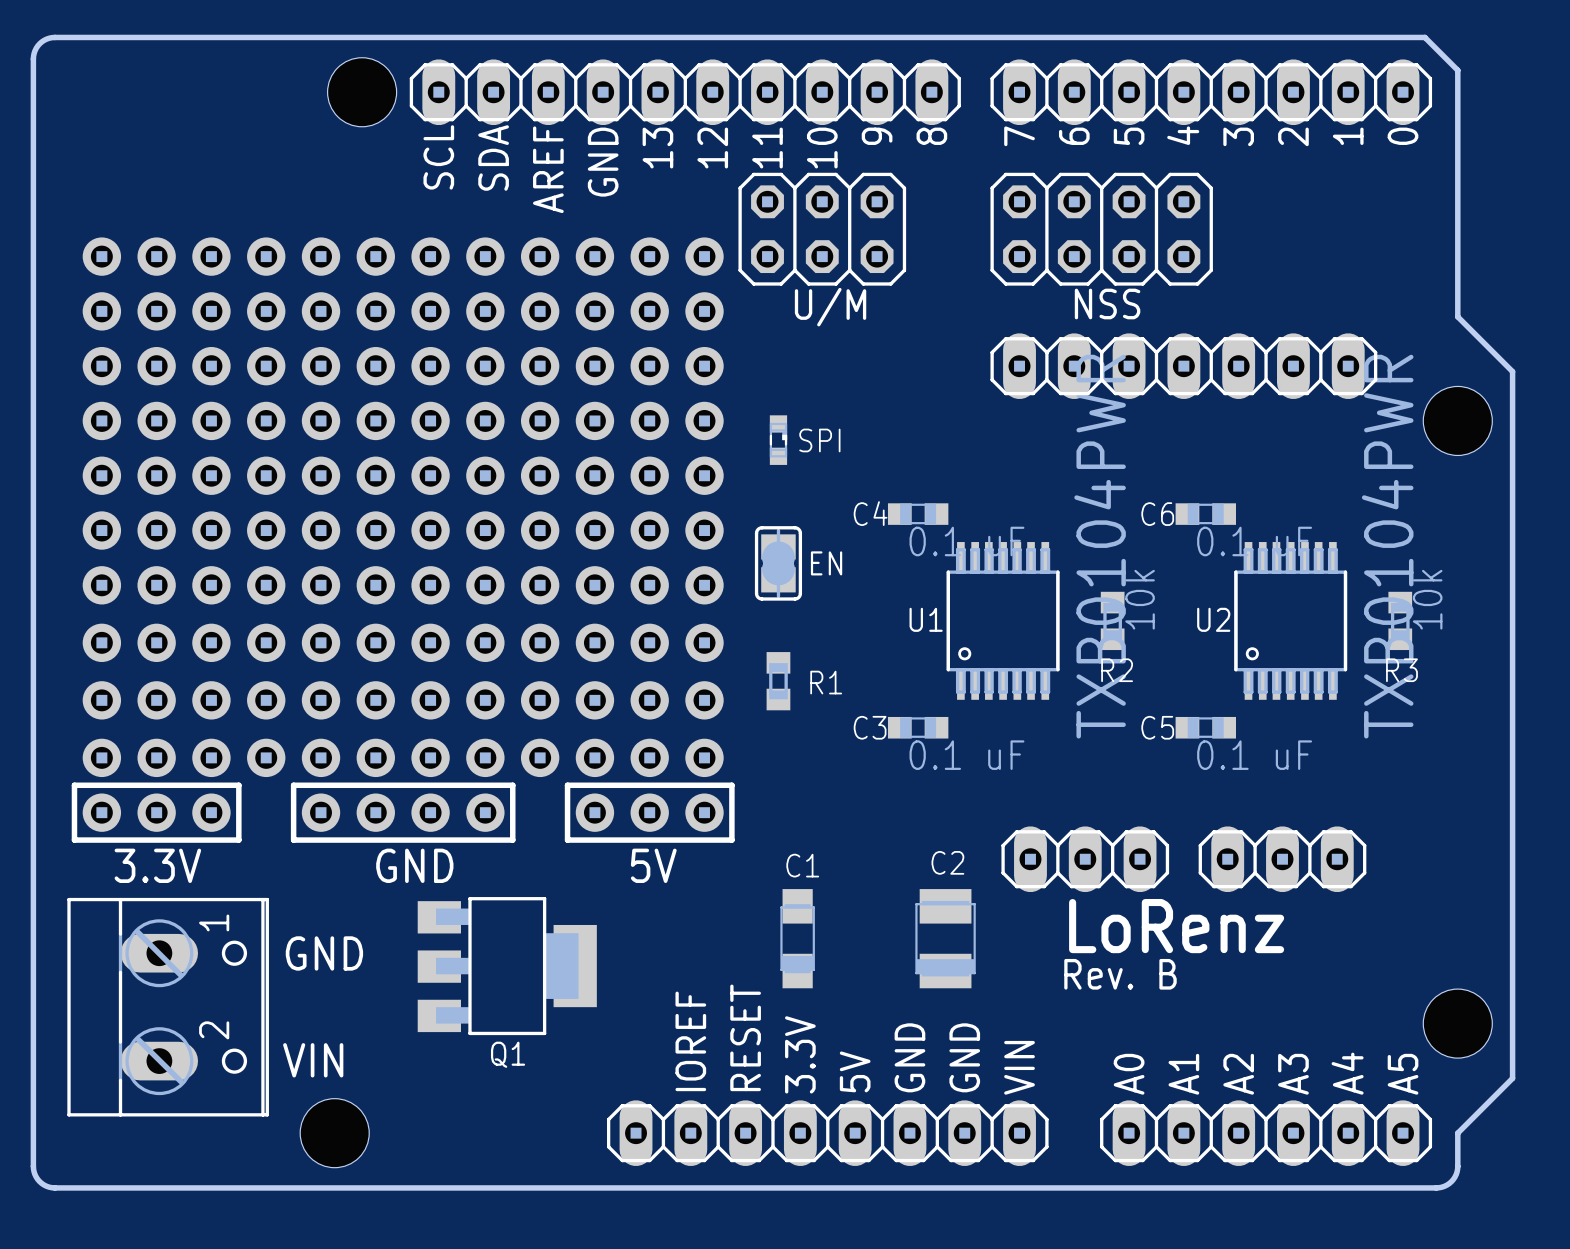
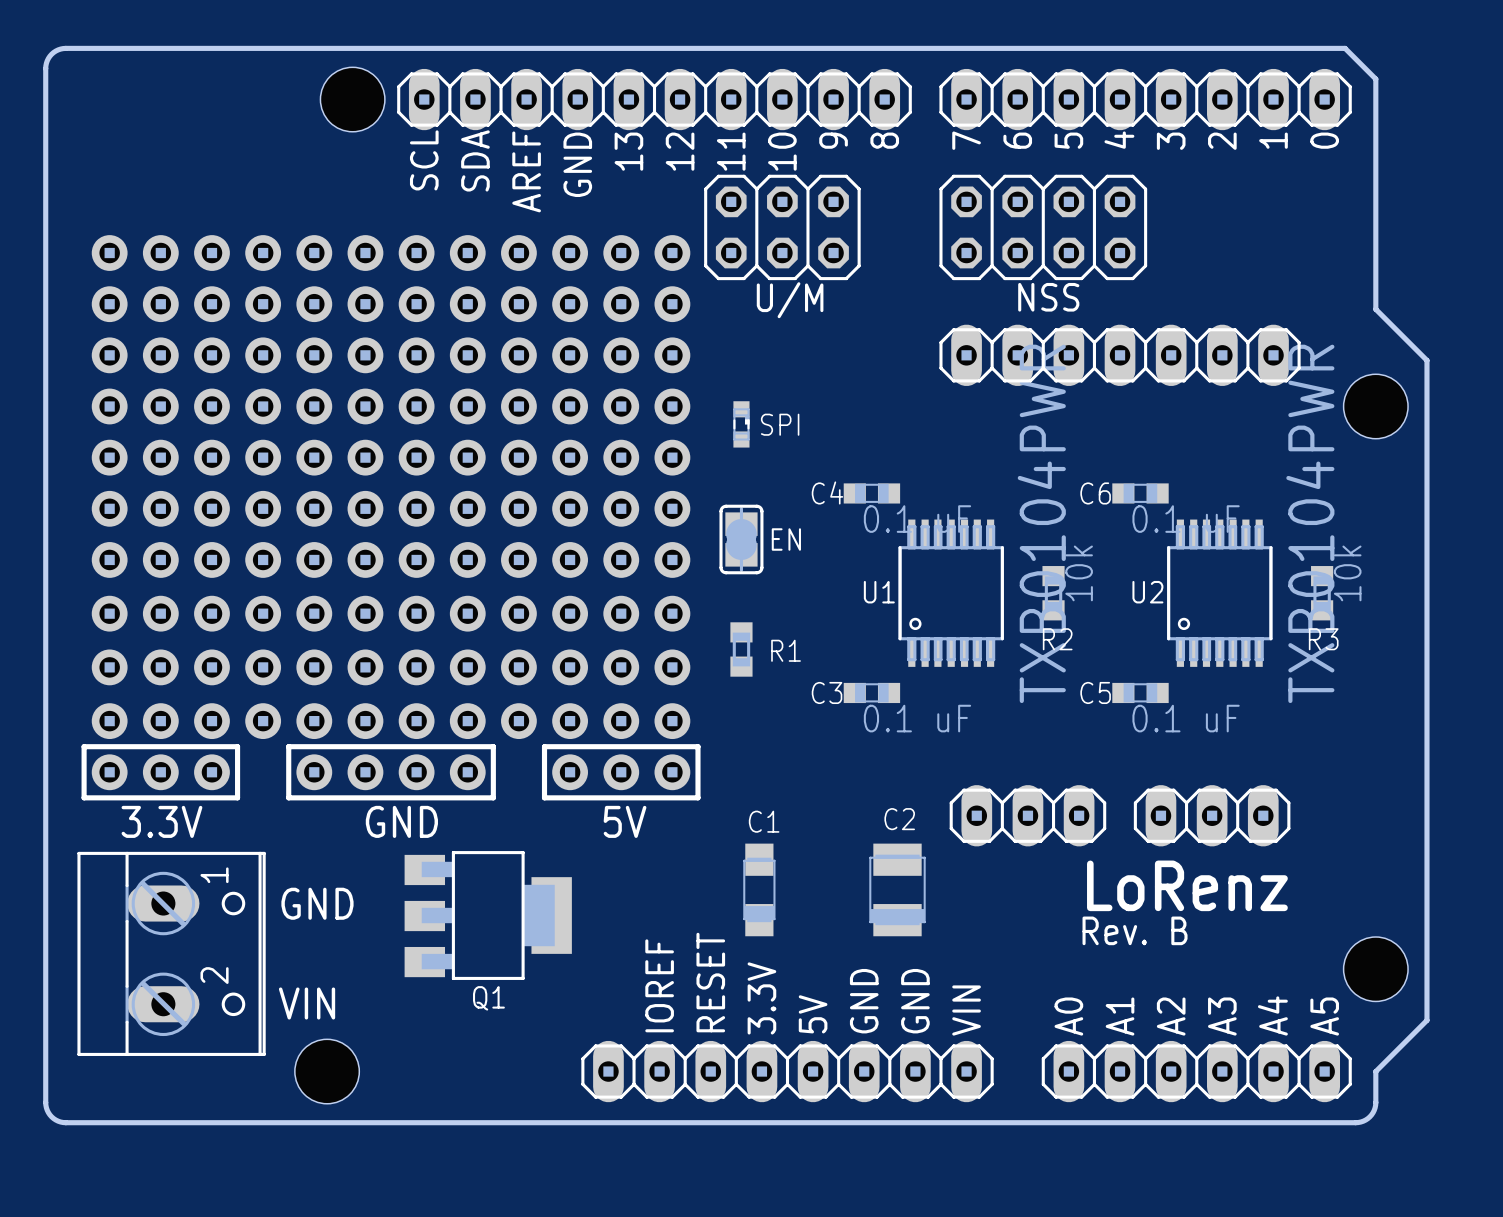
text position: LoRenz (1176, 926) -> LoRenz (1187, 885)
text position: Rev. B (1120, 974) -> Rev. B (1135, 930)

